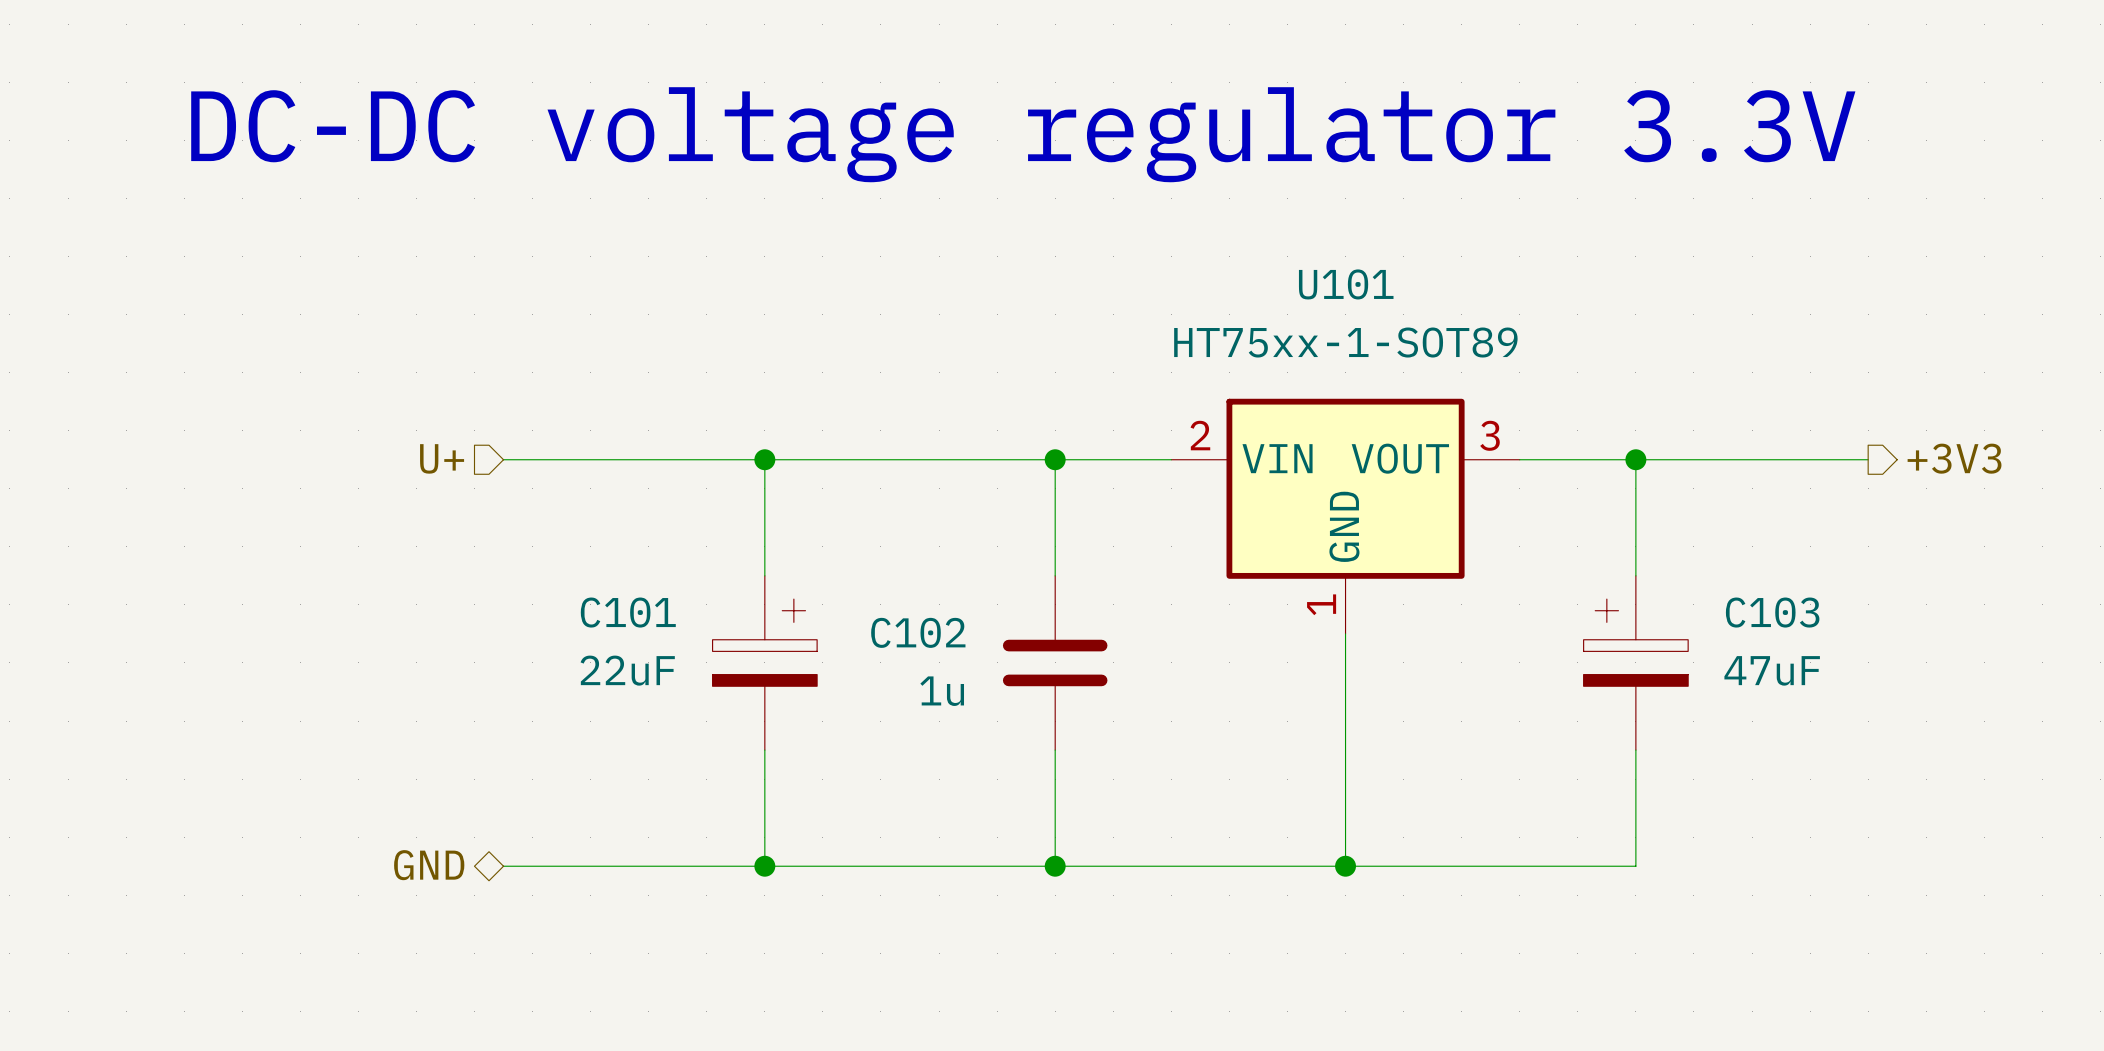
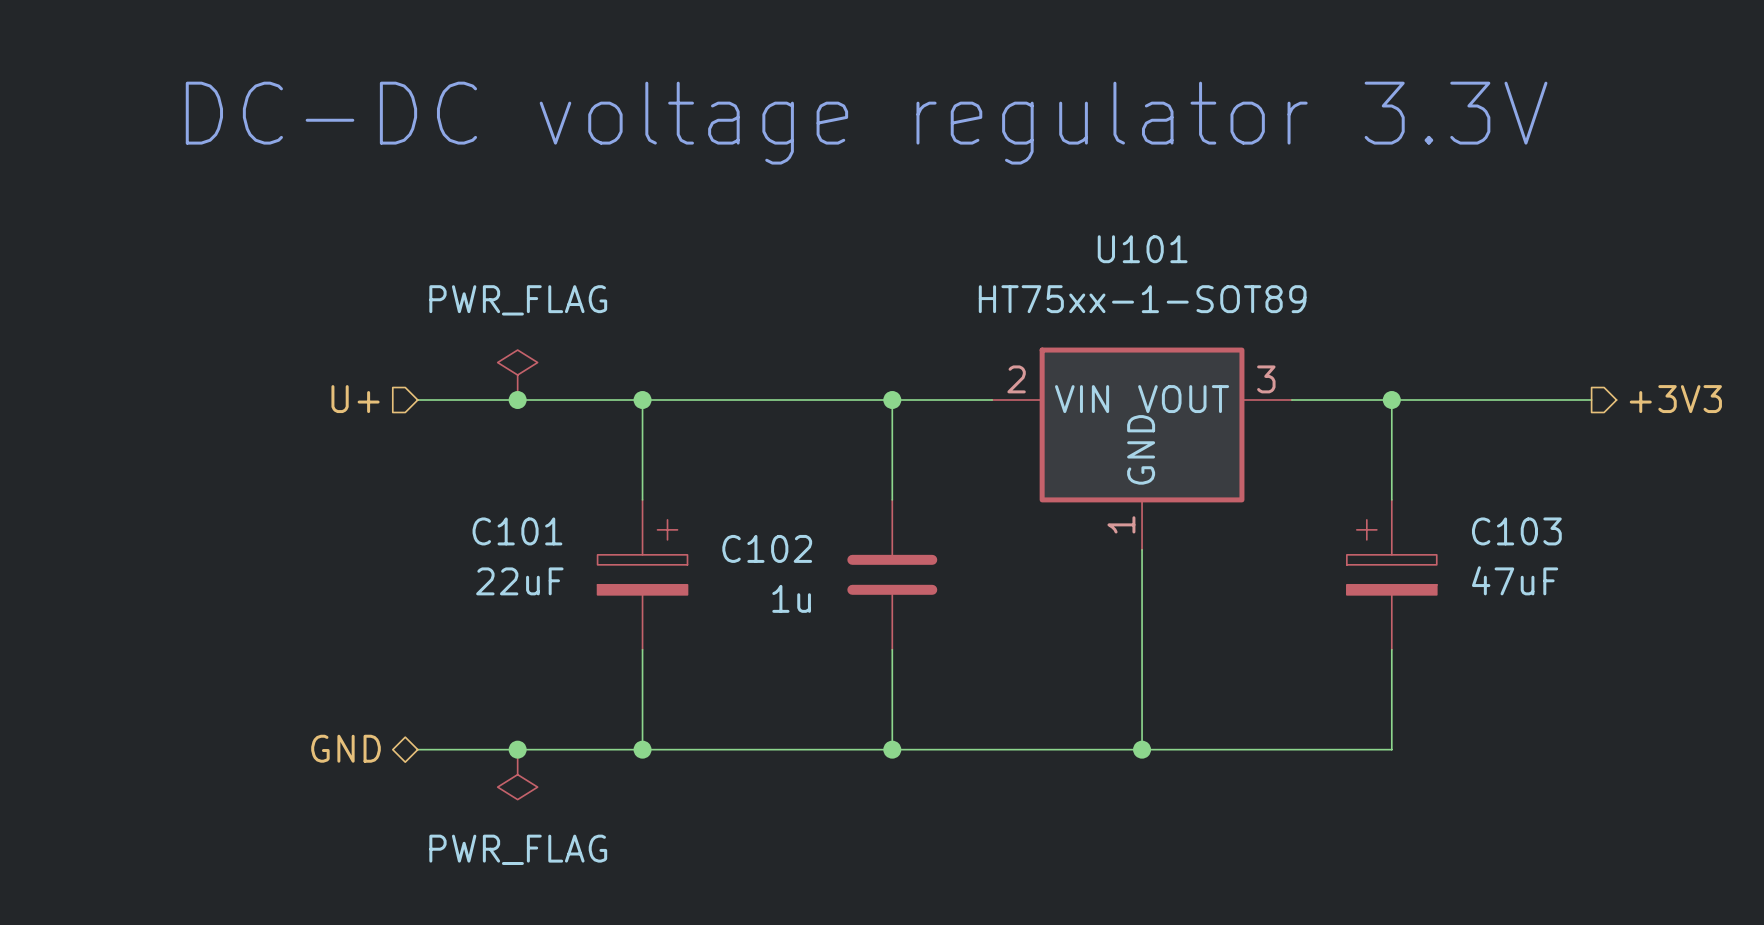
power symbol: none -> PWR_FLAG (517, 375)
junction: none -> (517, 400)
junction: none -> (517, 749)
power symbol: none -> PWR_FLAG (517, 774)

